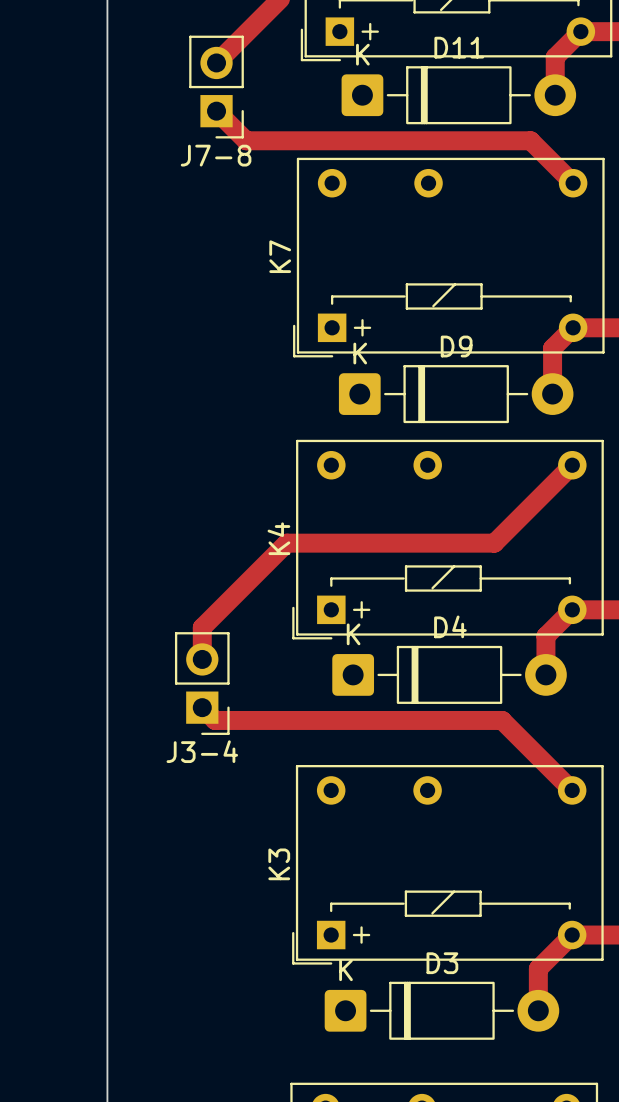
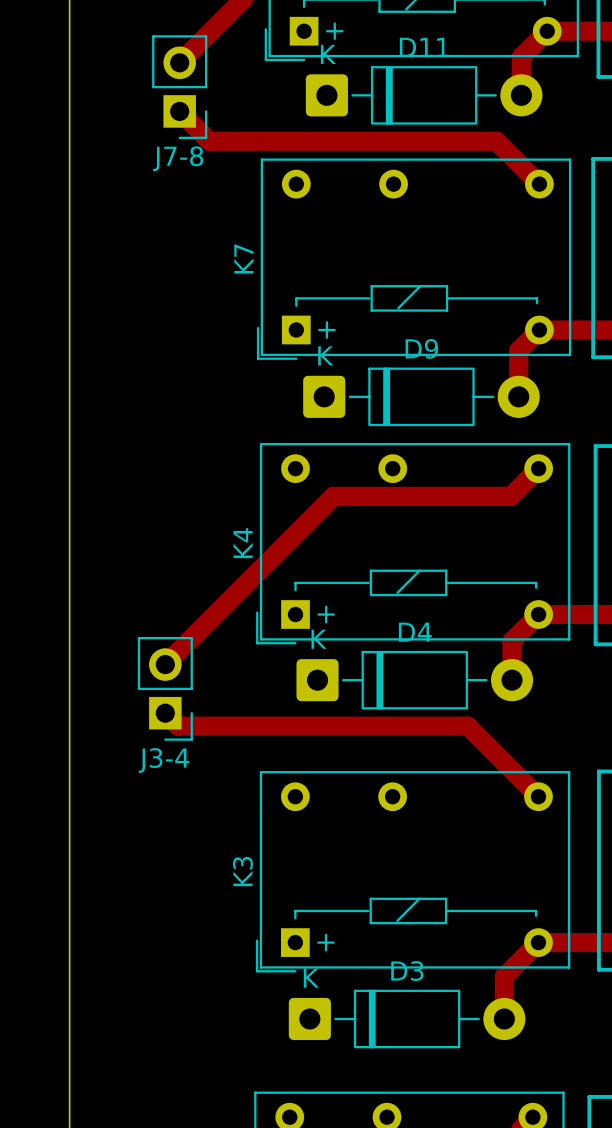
track: (544, 492) (494, 543) (286, 543) (202, 627) (202, 659) -> (510, 496) (333, 496) (165, 664)

